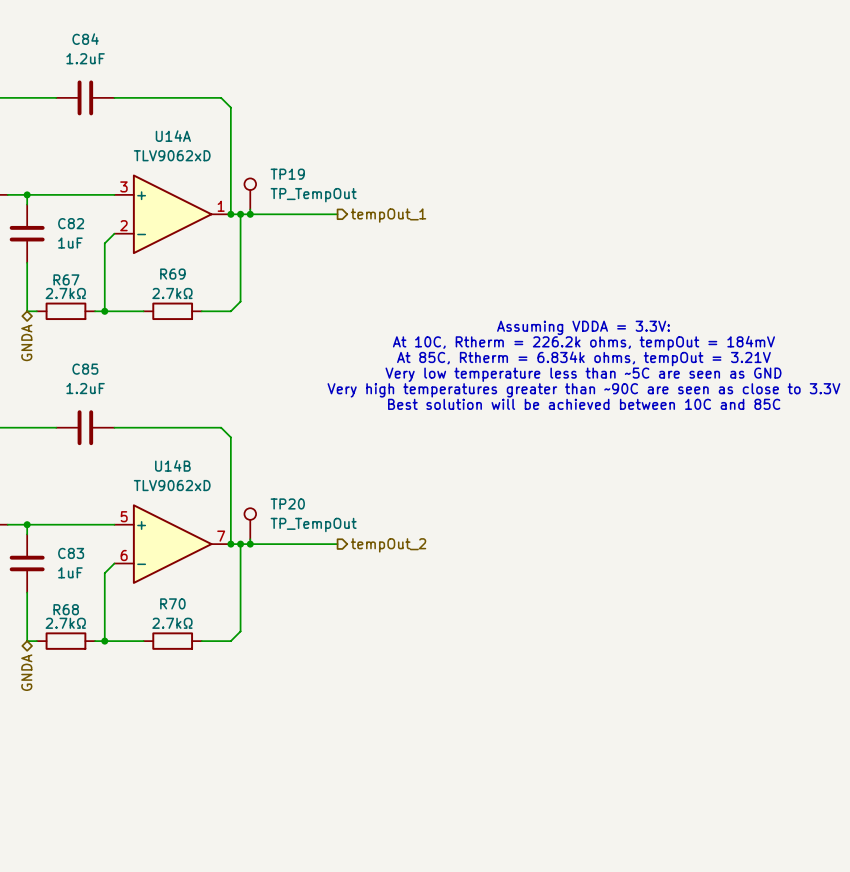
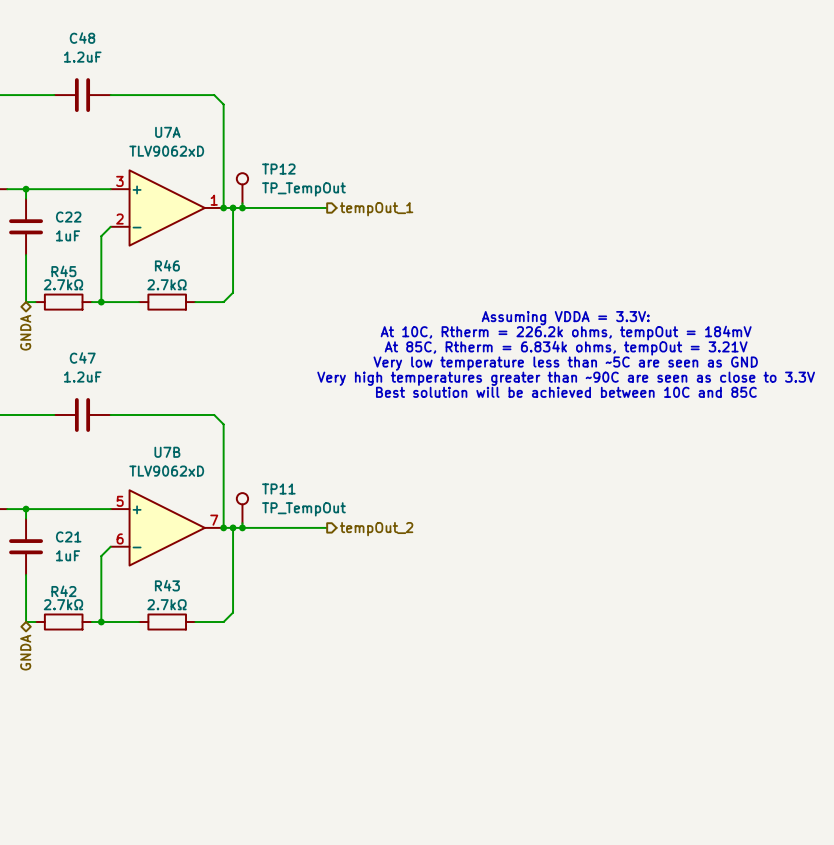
C84 name: C84 (85, 39) -> C48 (82, 38)
U14A name: U14A (173, 136) -> U7A (167, 132)
TP19 name: TP19 (287, 174) -> TP12 (278, 169)
C82 name: C82 (71, 223) -> C22 (68, 217)
R69 name: R69 (172, 274) -> R46 (167, 265)
R67 name: R67 (66, 279) -> R45 (63, 271)
C85 name: C85 (85, 369) -> C47 (82, 357)
U14B name: U14B (172, 465) -> U7B (167, 452)
TP20 name: TP20 (287, 503) -> TP11 (278, 488)
C83 name: C83 (71, 553) -> C21 (68, 536)
R70 name: R70 (172, 603) -> R43 (167, 585)
R68 name: R68 (66, 609) -> R42 (63, 591)

